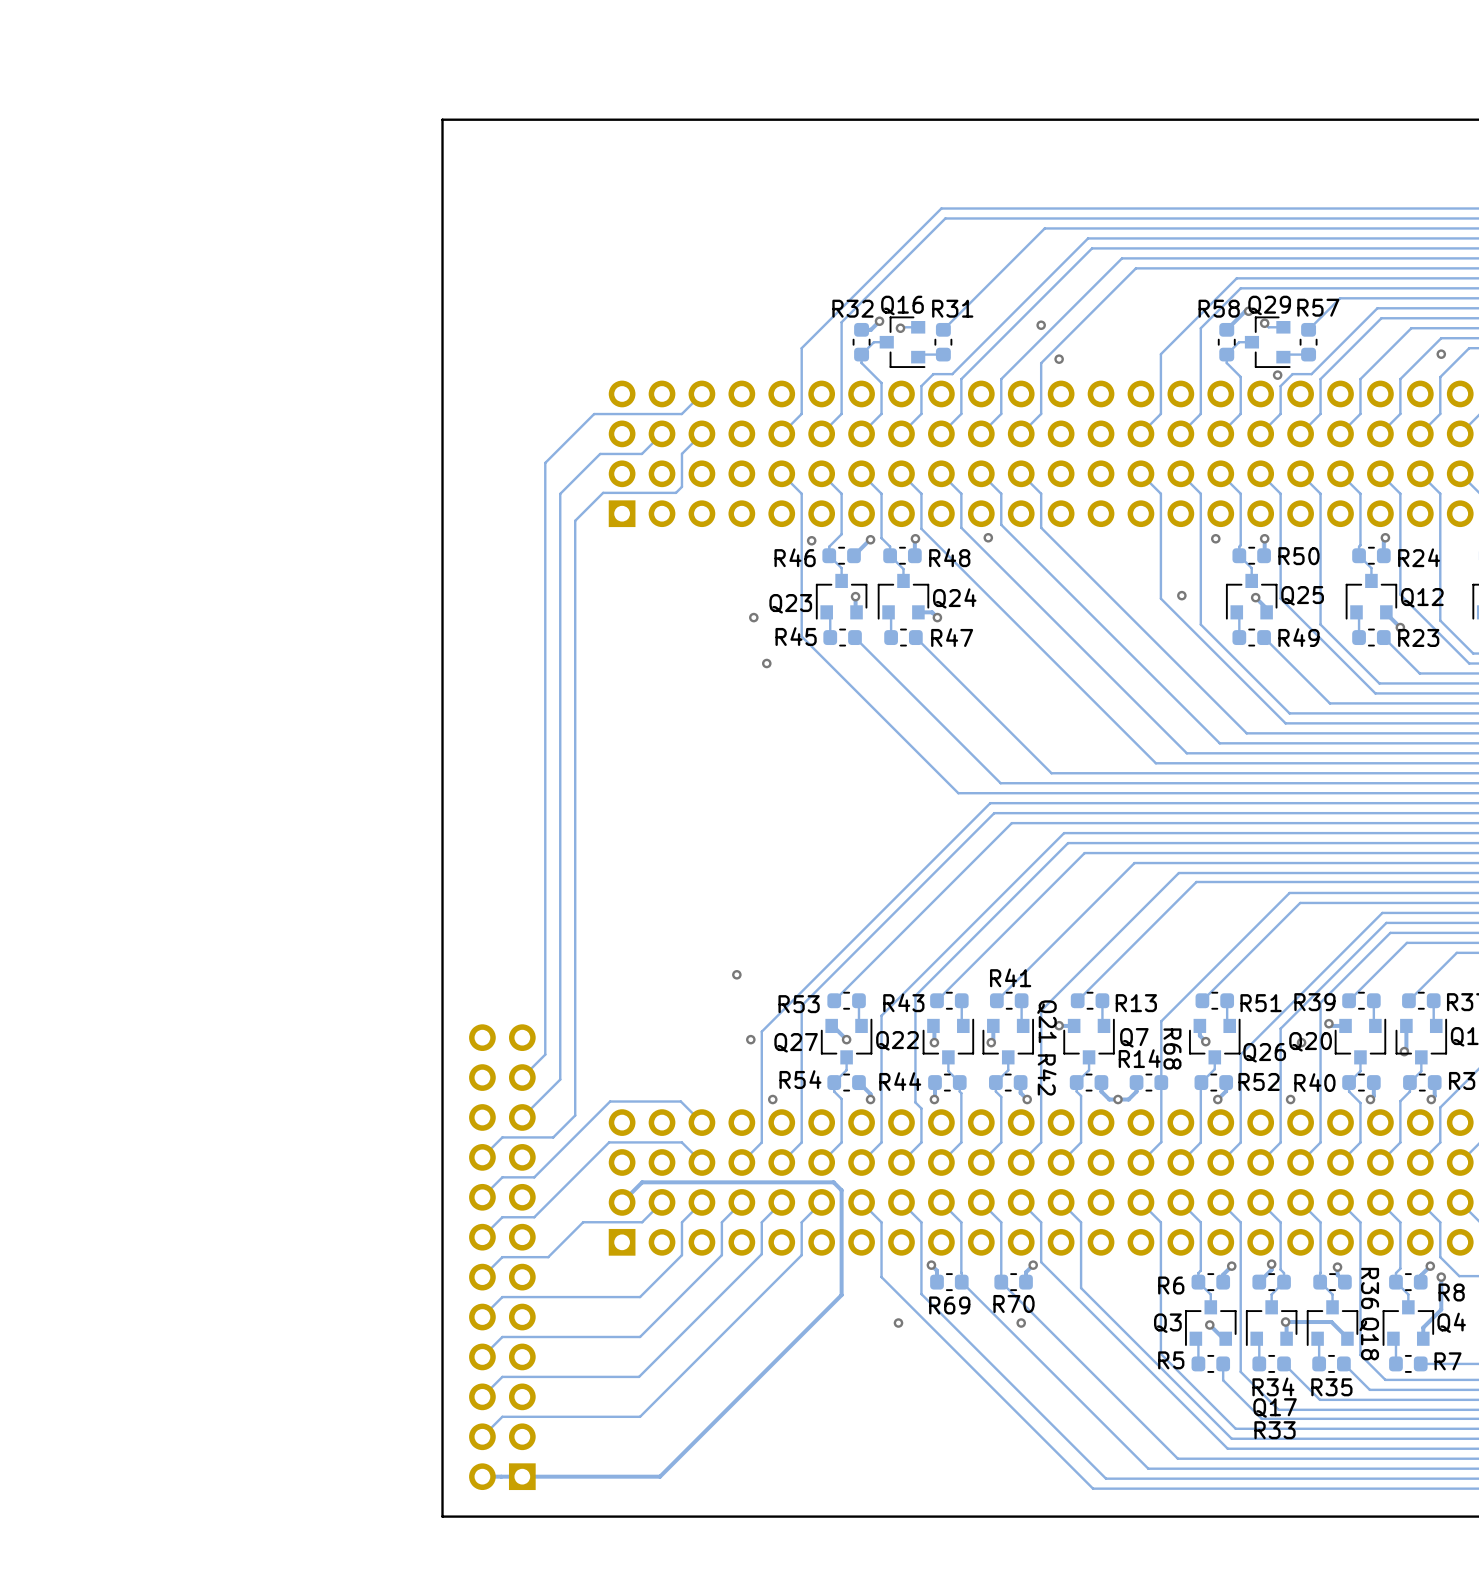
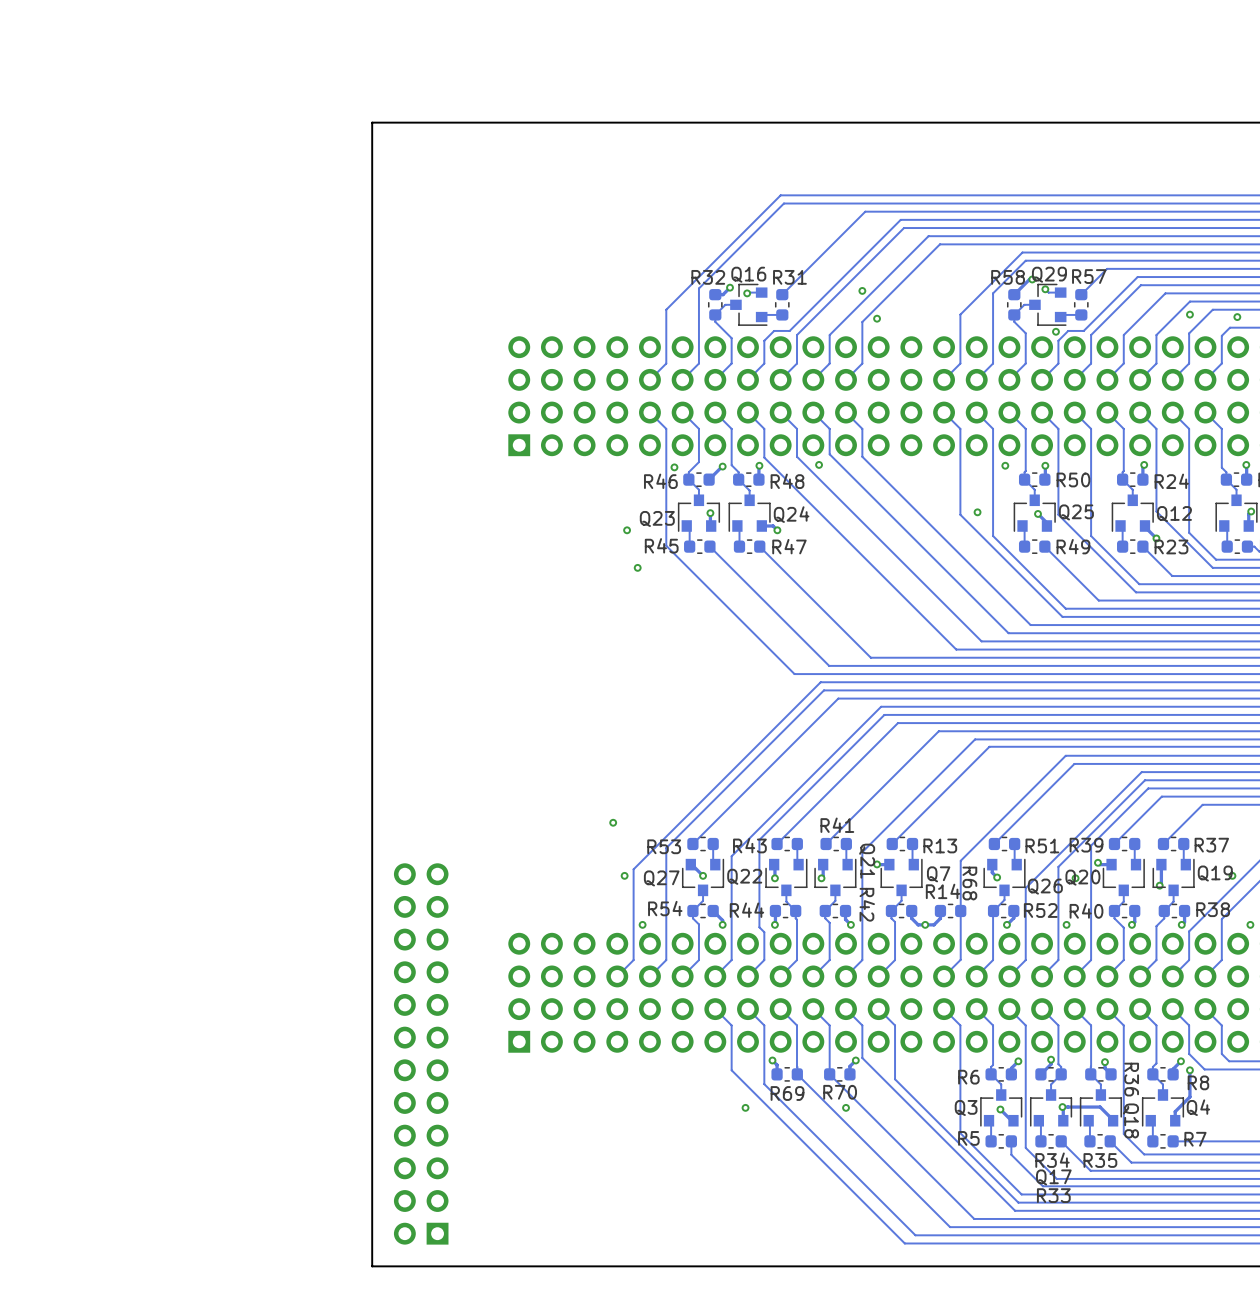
track: (701, 393) (681, 414) (594, 414) (545, 462) (545, 1054) (522, 1077) -> none
track: (662, 433) (641, 453) (600, 453) (560, 493) (560, 1079) (522, 1117) -> none
track: (701, 433) (681, 453) (681, 486) (675, 492) (603, 492) (575, 520) (575, 1115) (553, 1137) (502, 1137) (482, 1157) -> none
track: (701, 1122) (680, 1101) (610, 1101) (534, 1177) (502, 1177) (482, 1197) -> none
track: (701, 1162) (681, 1142) (609, 1142) (534, 1217) (502, 1217) (482, 1237) -> none
track: (622, 1202) (642, 1182) (833, 1182) (841, 1190) (841, 1295) (660, 1476) (482, 1476) -> none
track: (662, 1202) (642, 1222) (583, 1222) (548, 1257) (502, 1257) (482, 1277) -> none
track: (701, 1202) (681, 1222) (681, 1255) (640, 1297) (502, 1297) (482, 1317) -> none
track: (741, 1202) (721, 1222) (721, 1255) (640, 1336) (502, 1336) (482, 1356) -> none
track: (781, 1202) (761, 1222) (761, 1254) (639, 1376) (502, 1376) (482, 1396) -> none
track: (821, 1202) (801, 1222) (801, 1255) (640, 1416) (502, 1416) (482, 1436) -> none

